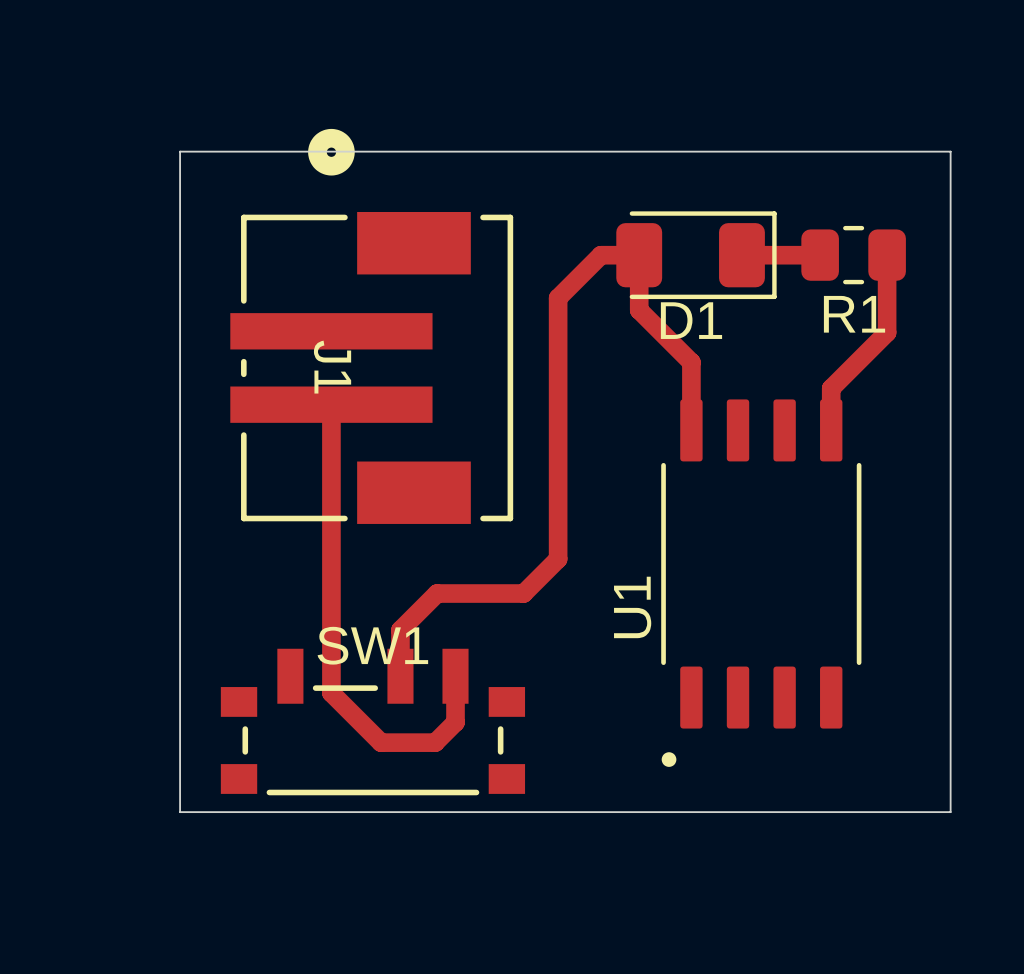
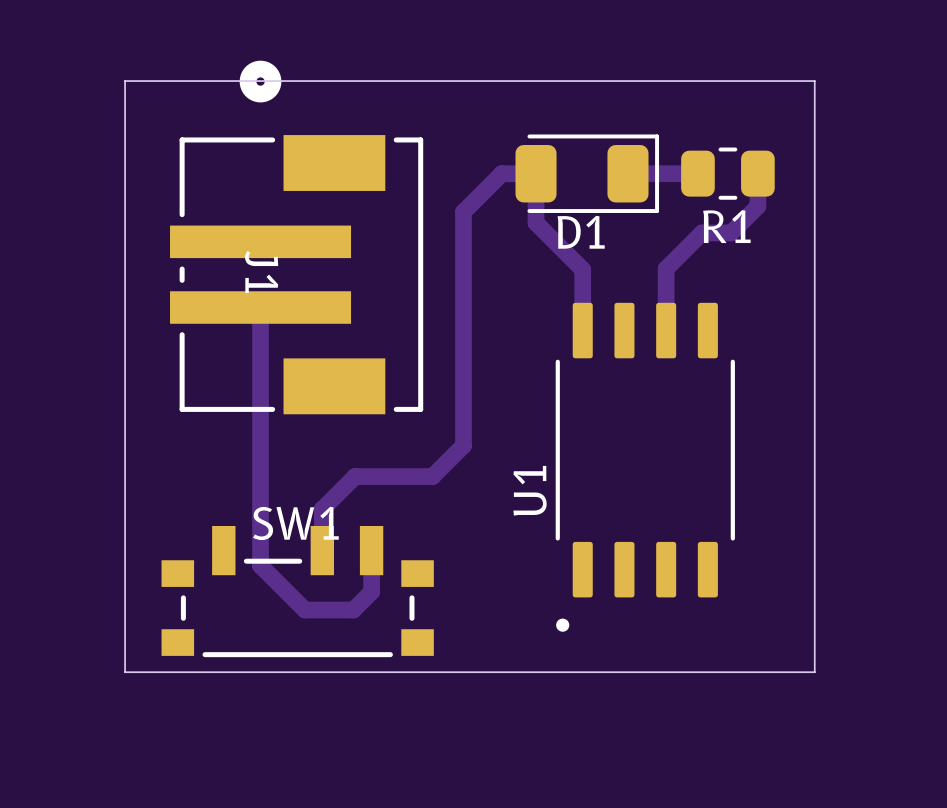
track: (887, 291) (887, 332) (831, 388) (831, 430) -> (757, 206) (731, 232) (702, 232) (666, 268) (666, 330)

